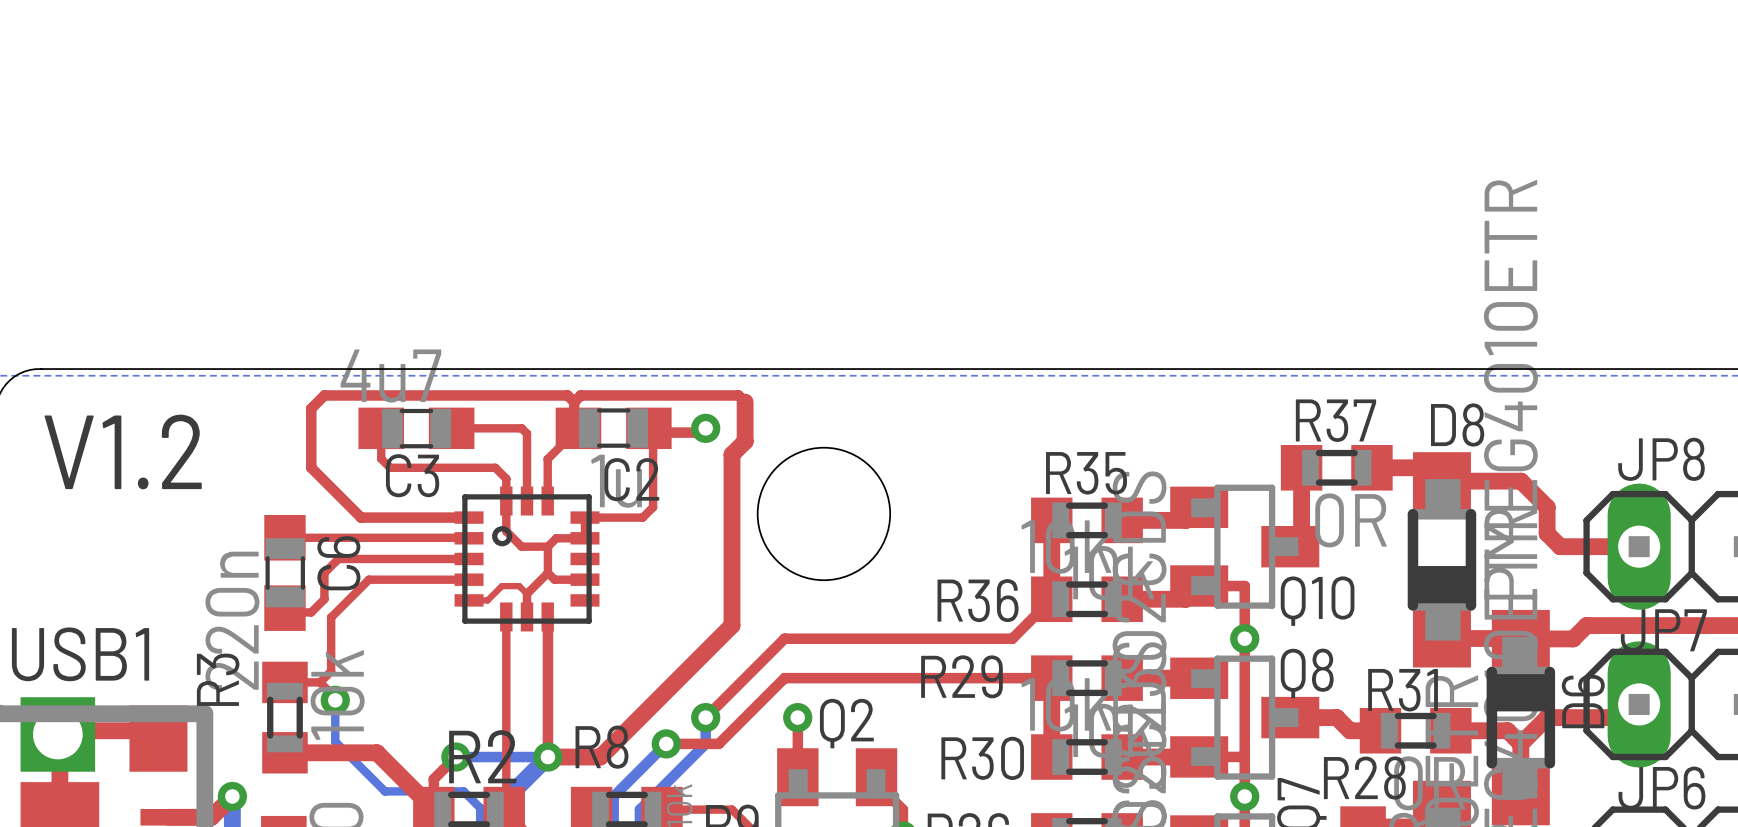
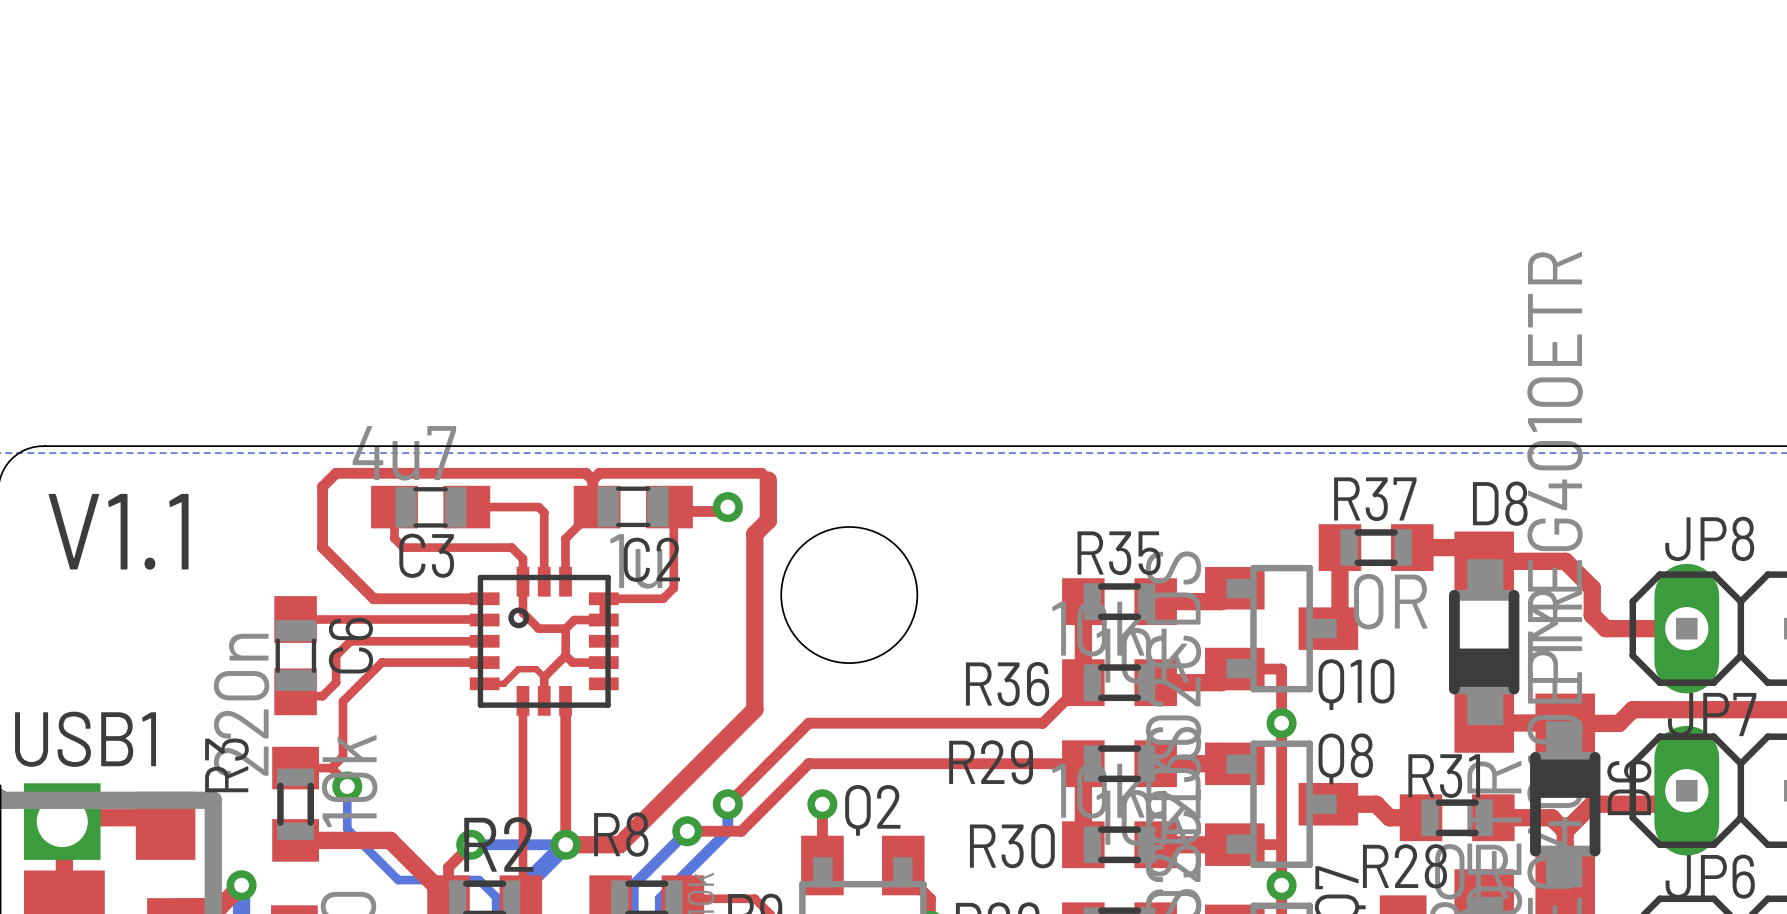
text: V1.2 (123, 451) -> V1.1 (118, 531)

